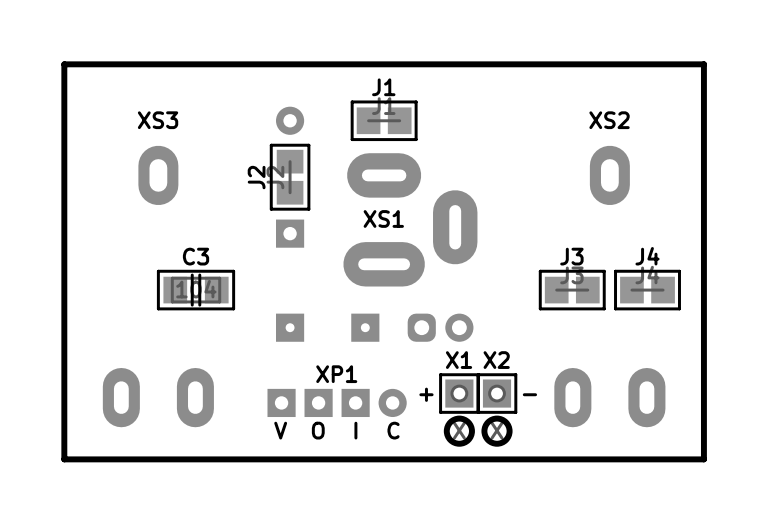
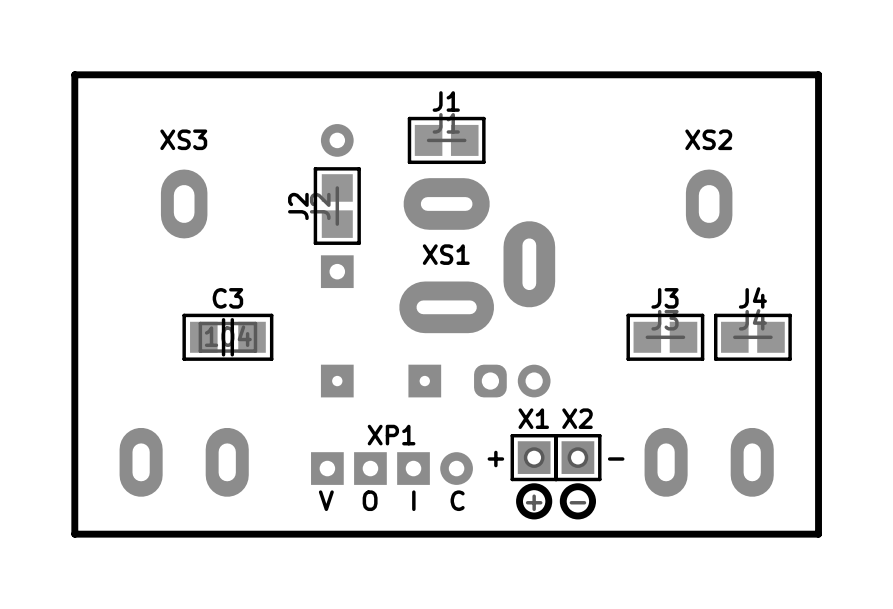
X1 value: X (459, 430) -> + (534, 502)
X2 value: X (497, 430) -> - (577, 502)

